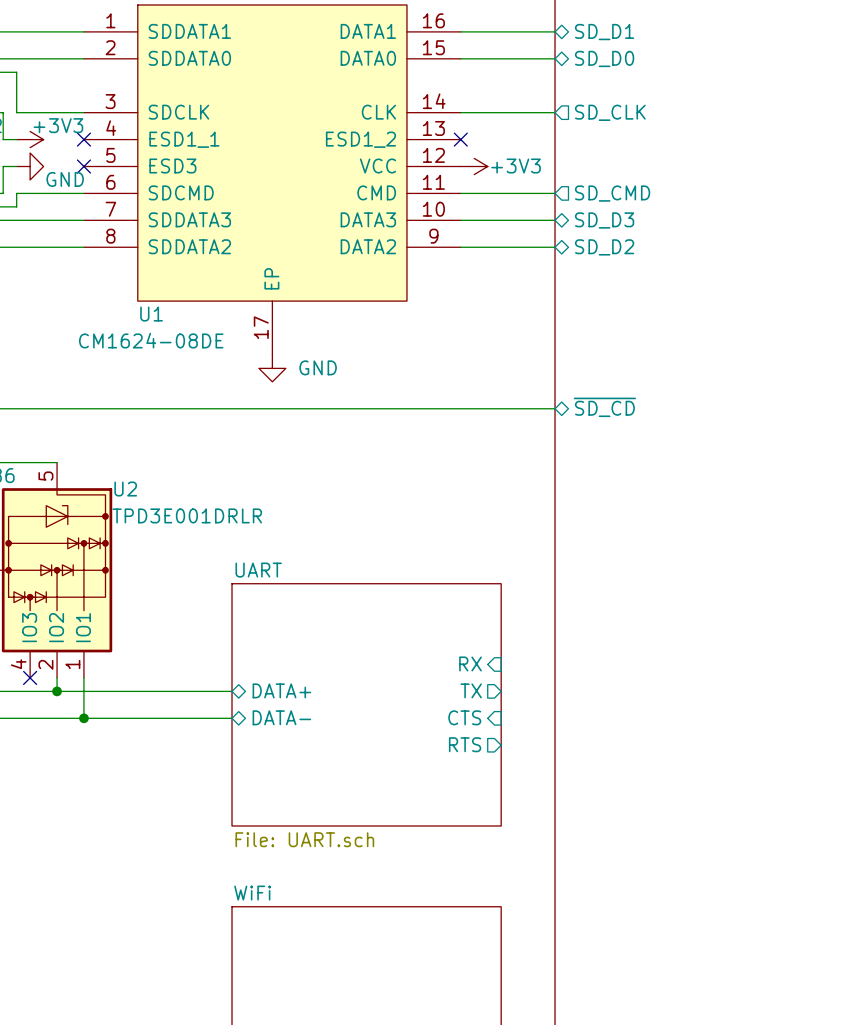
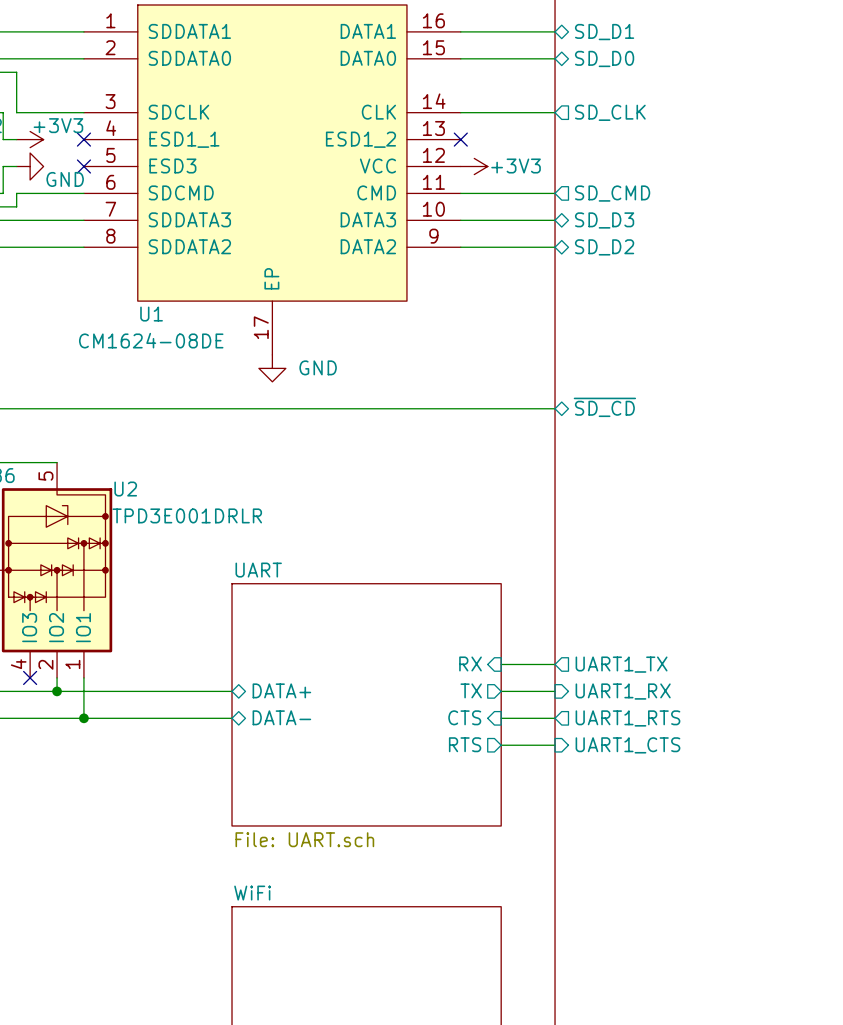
wire: none -> (501, 664) (555, 664)
sheet pin: none -> UART1_TX (621, 664)
wire: none -> (501, 691) (555, 691)
sheet pin: none -> UART1_RX (623, 691)
wire: none -> (501, 718) (555, 718)
sheet pin: none -> UART1_RTS (627, 718)
wire: none -> (501, 745) (555, 745)
sheet pin: none -> UART1_CTS (627, 745)

